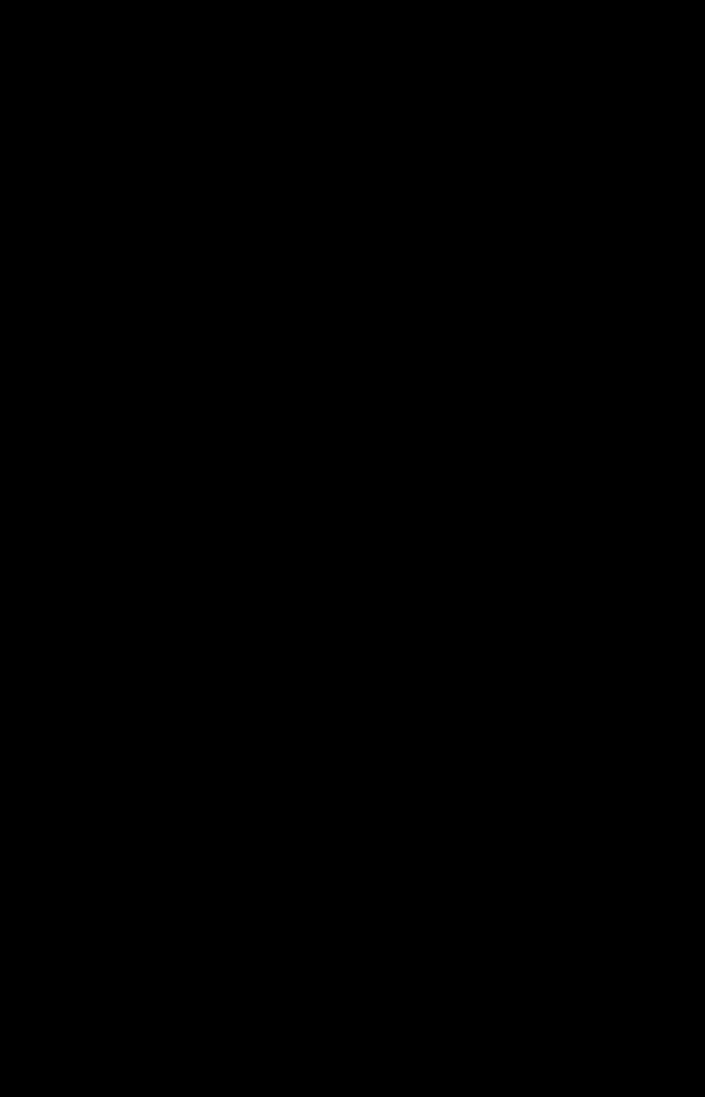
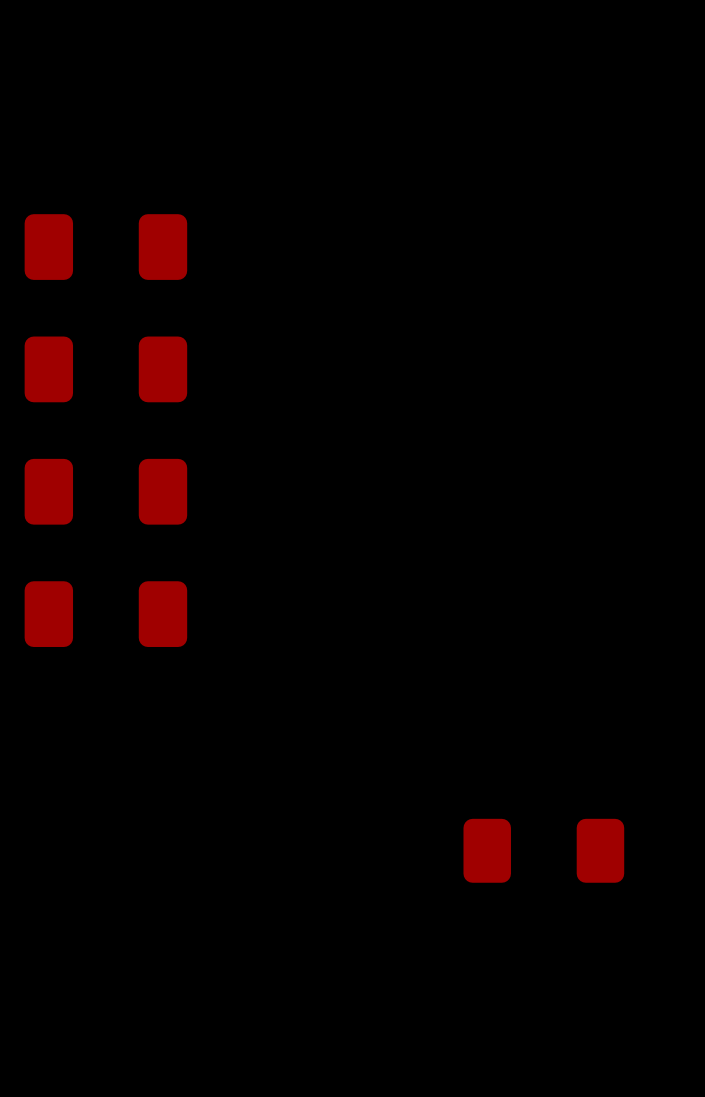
part: none -> (105, 247)
part: none -> (105, 369)
part: none -> (105, 491)
part: none -> (105, 614)
part: none -> (543, 850)

